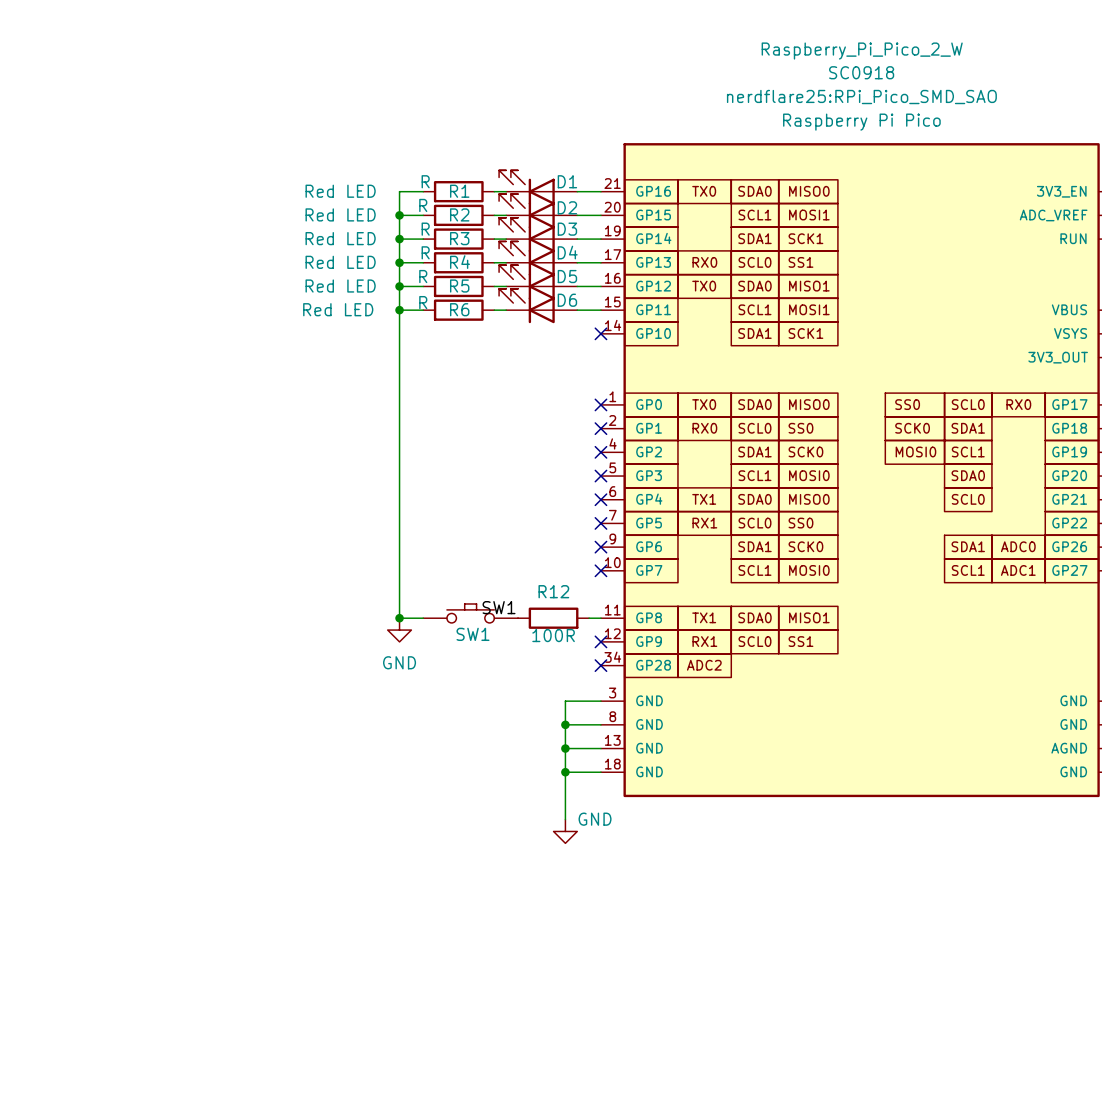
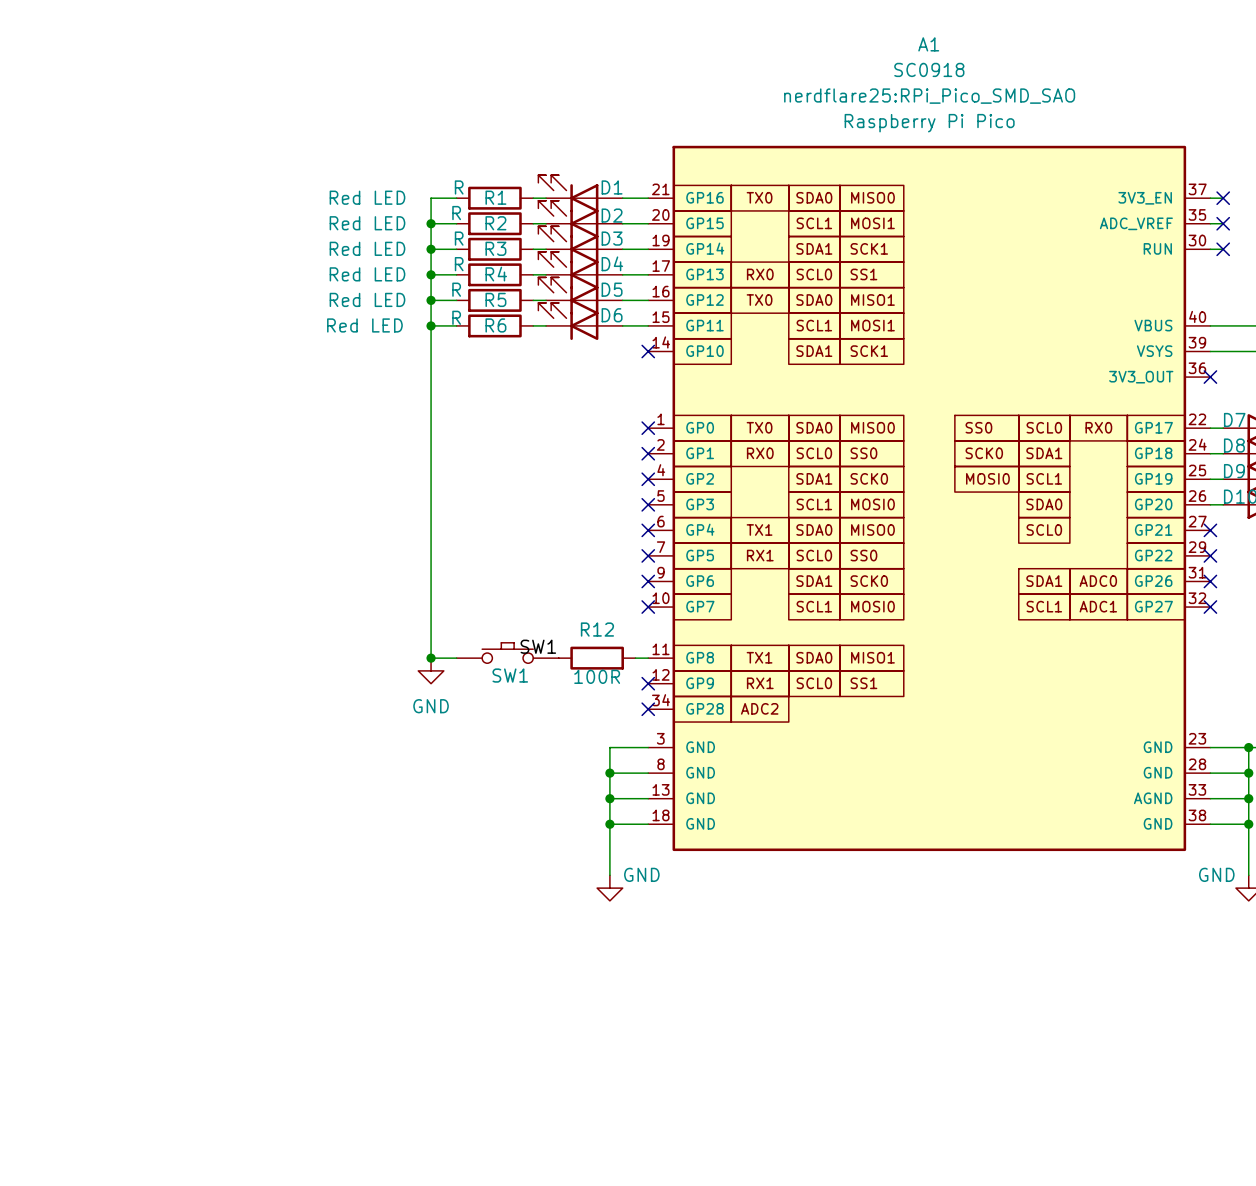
Raspberry_Pi_Pico_2_W name: Raspberry_Pi_Pico_2_W (862, 51) -> A1 (928, 44)

